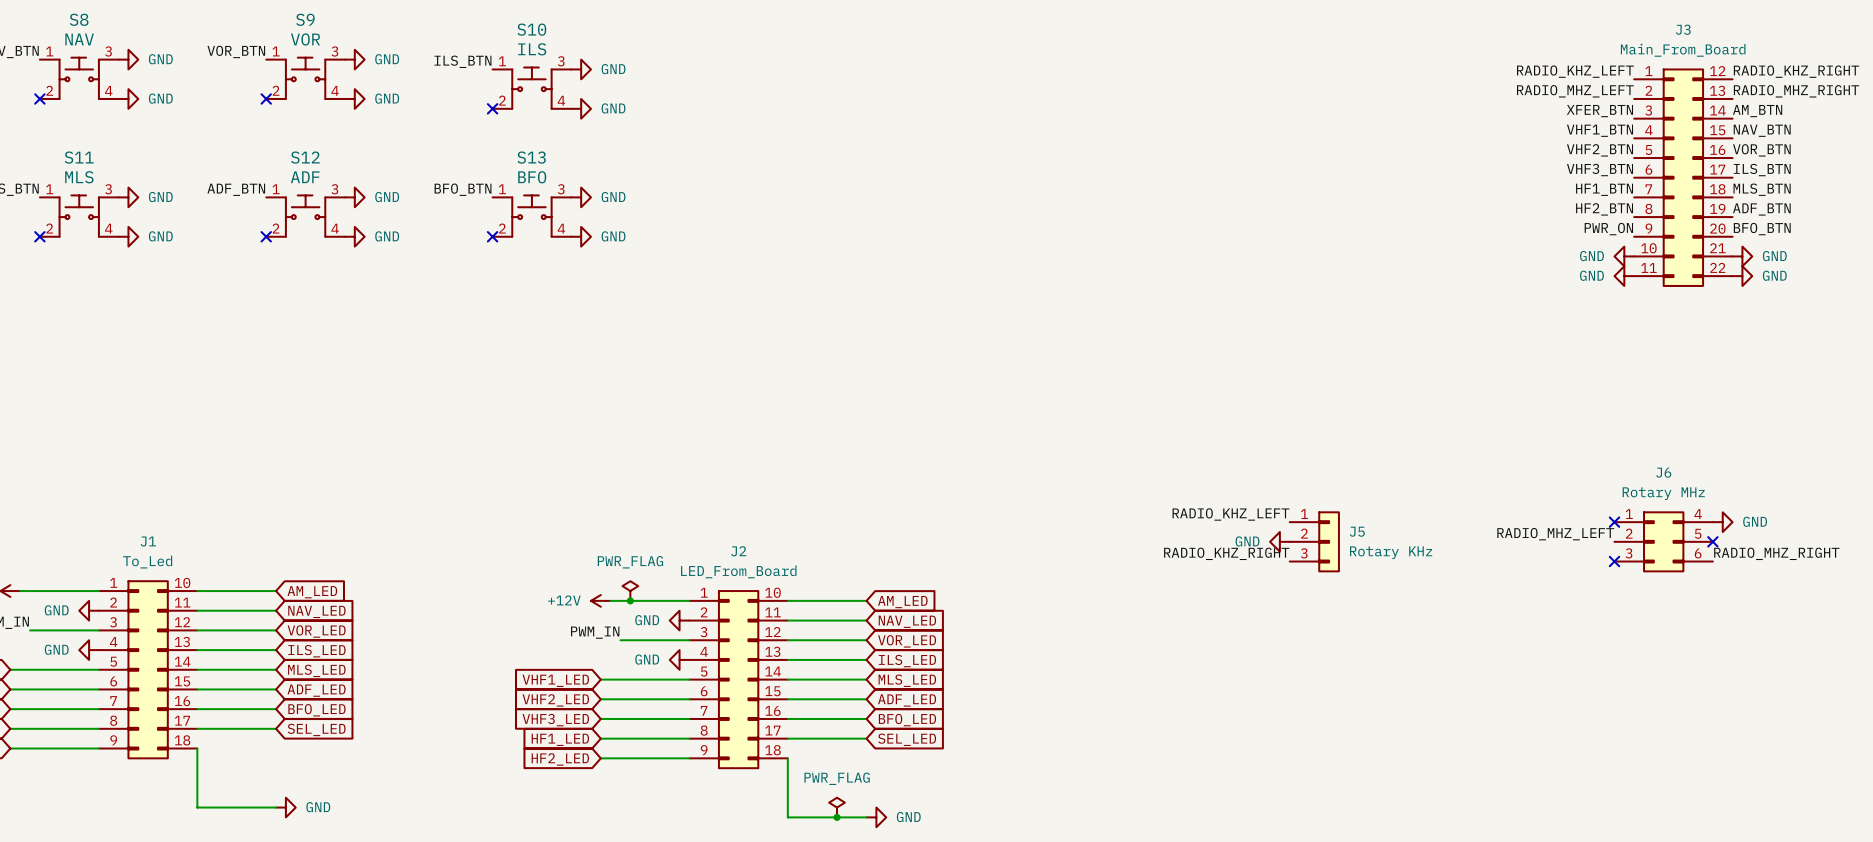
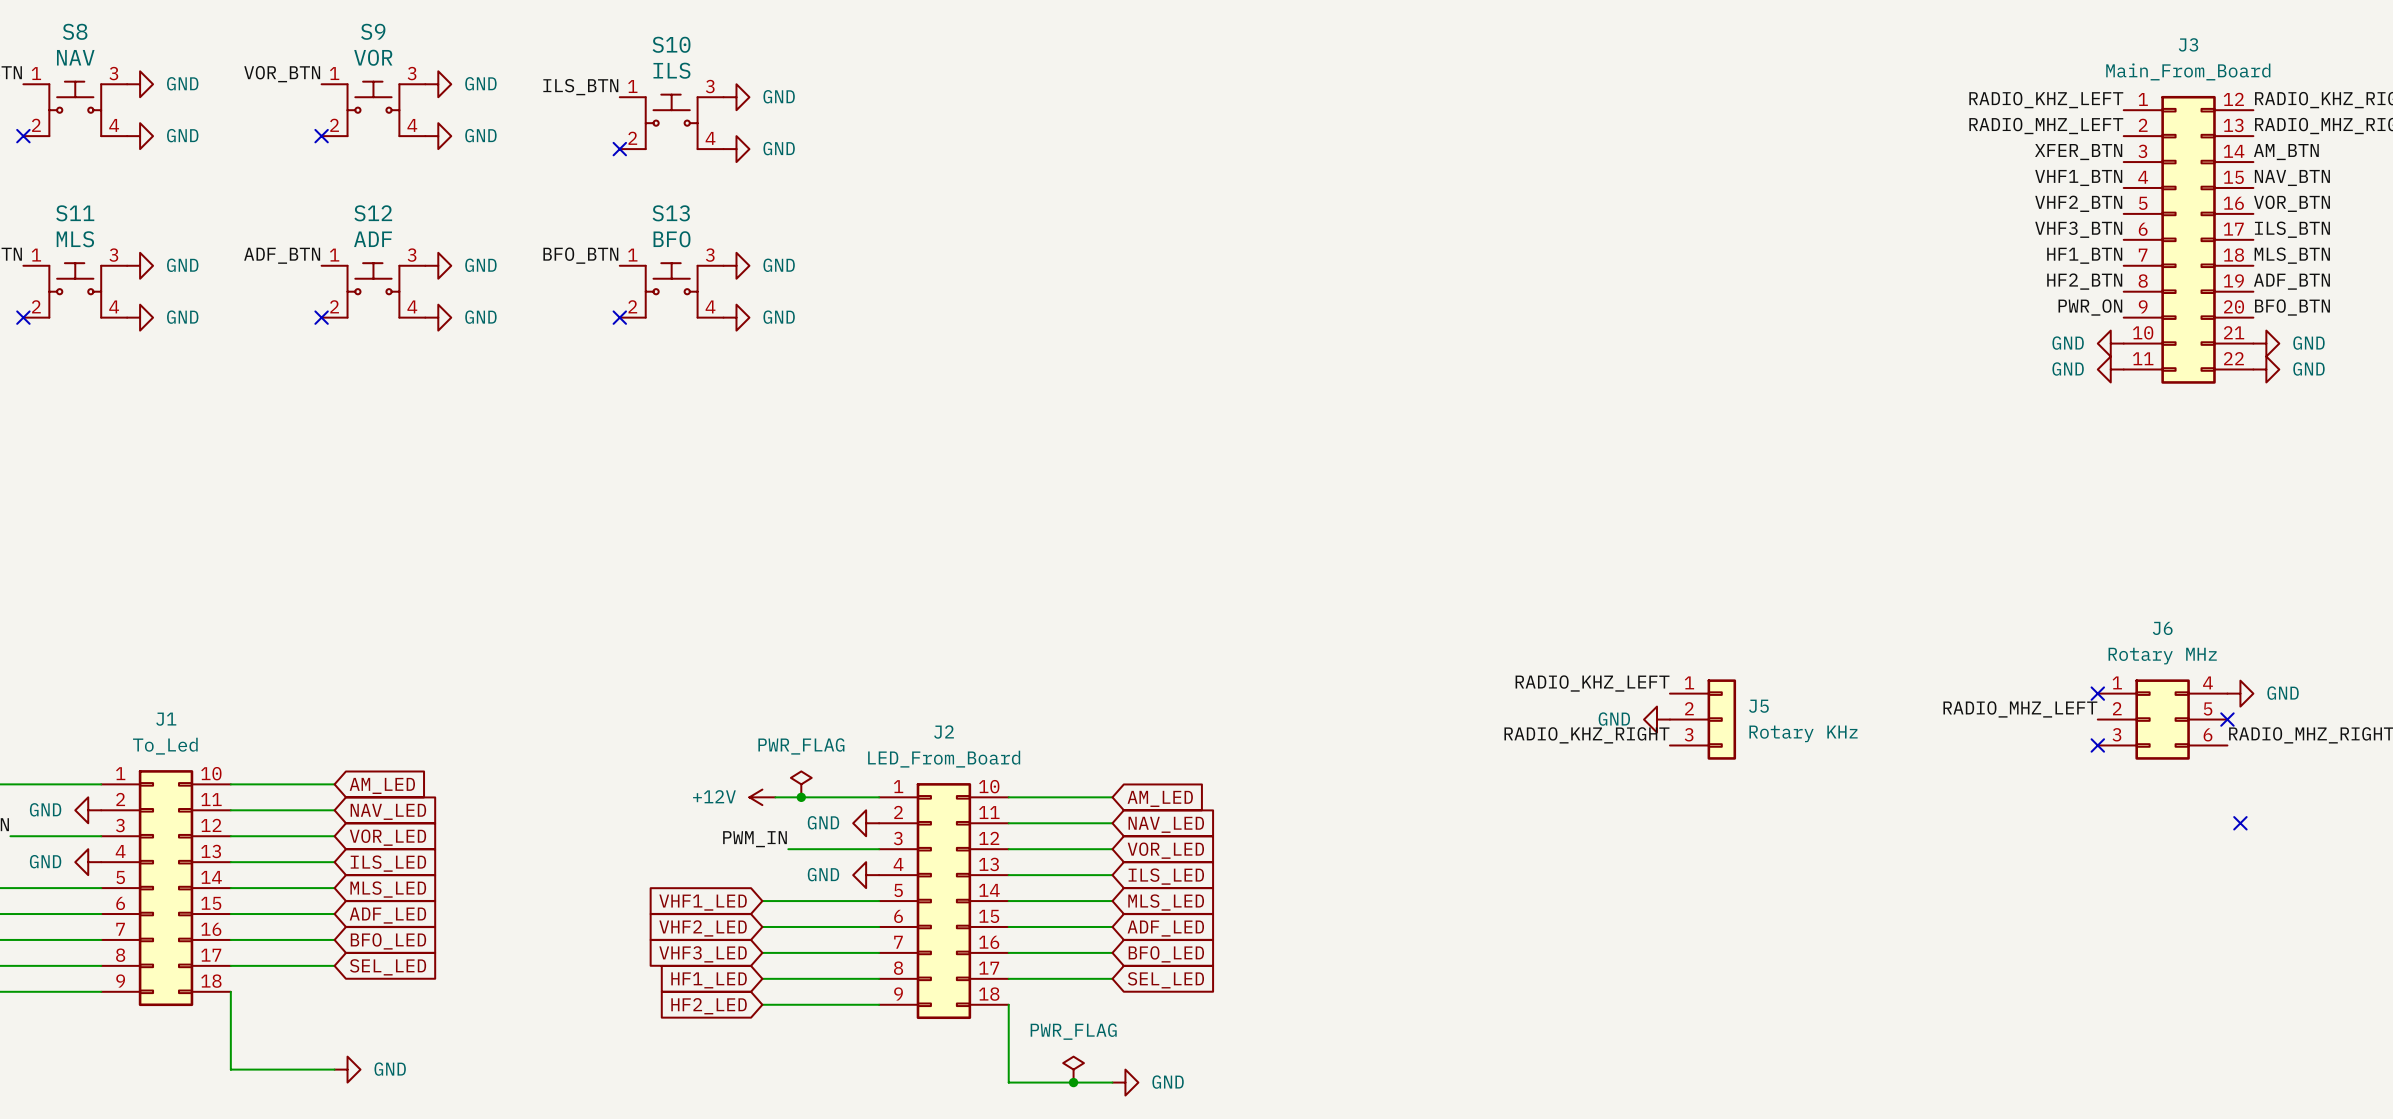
no-connect mark: none -> (2240, 823)

